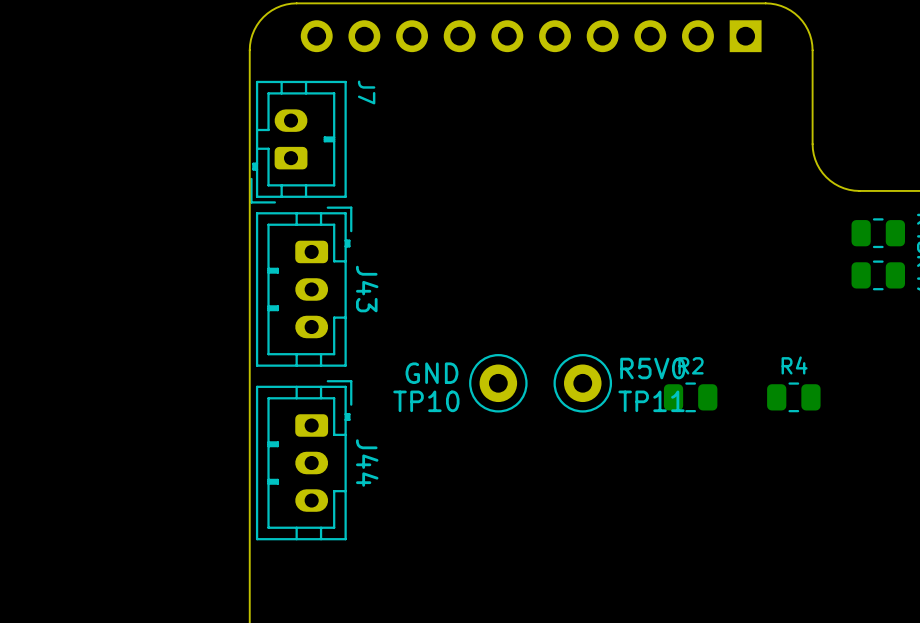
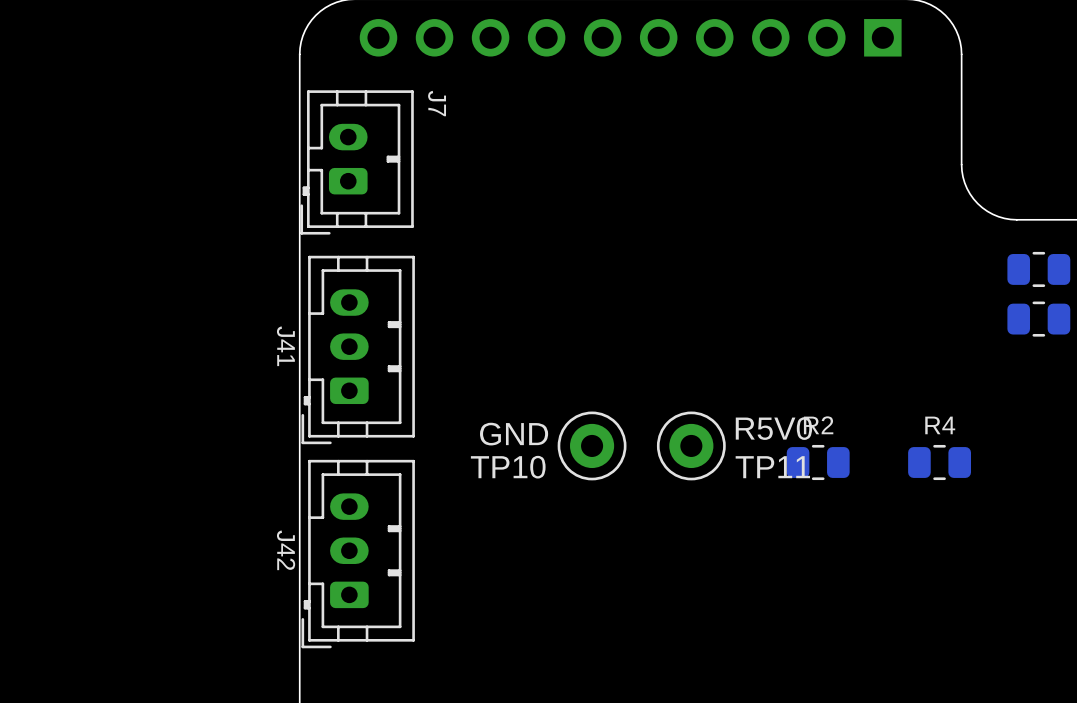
J43: (304, 286) -> none
J41: none -> (358, 349)
J44: (304, 460) -> none
J42: none -> (358, 554)

